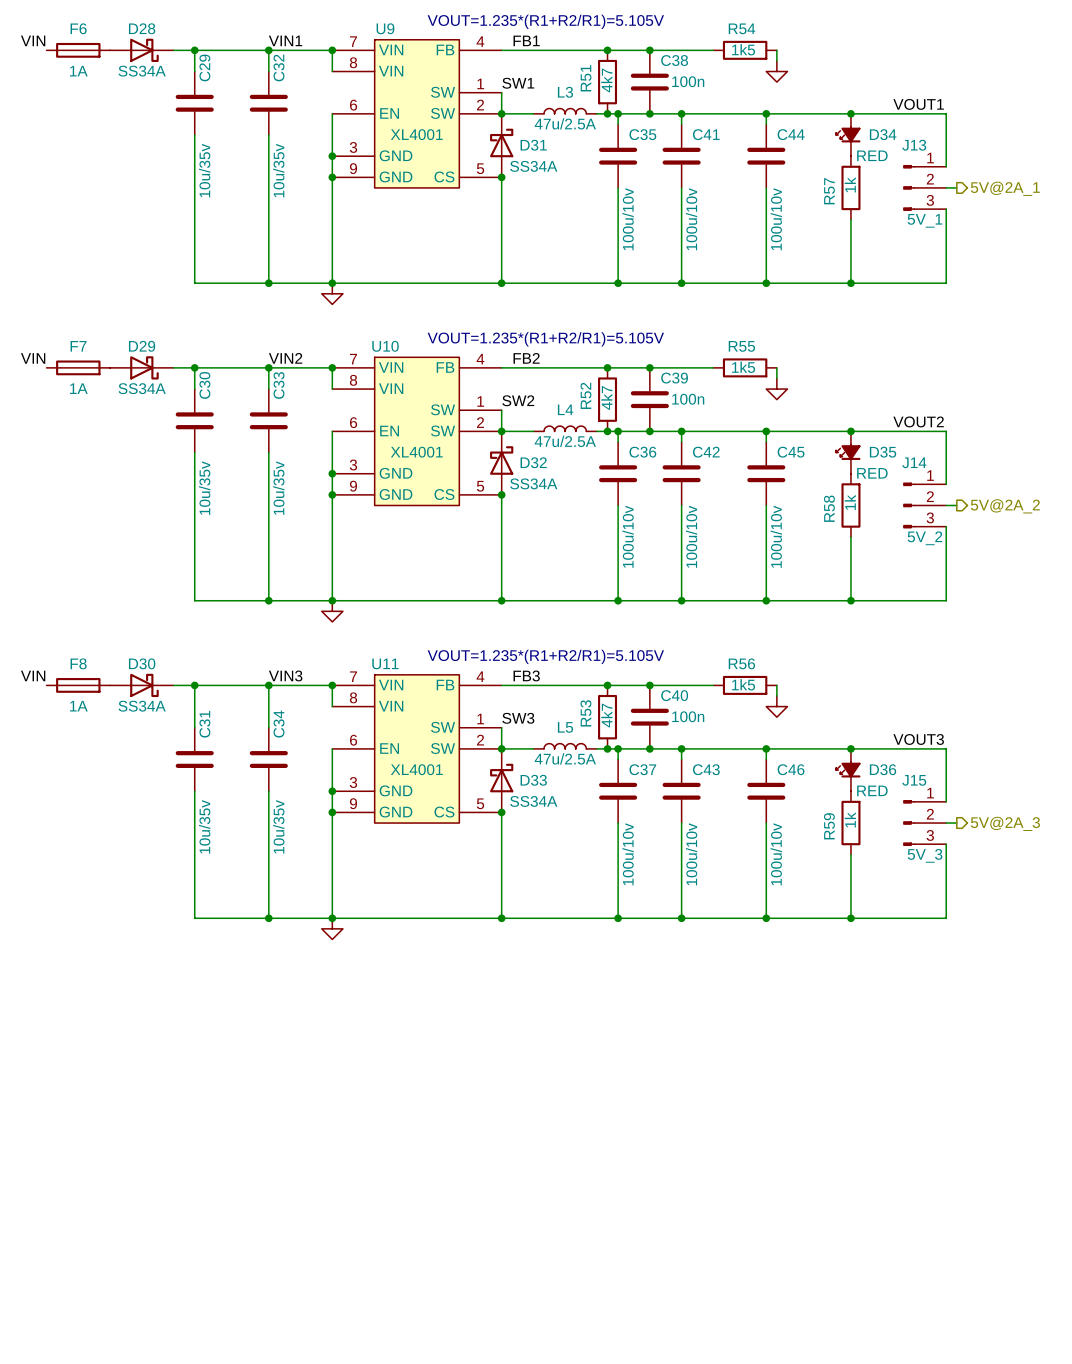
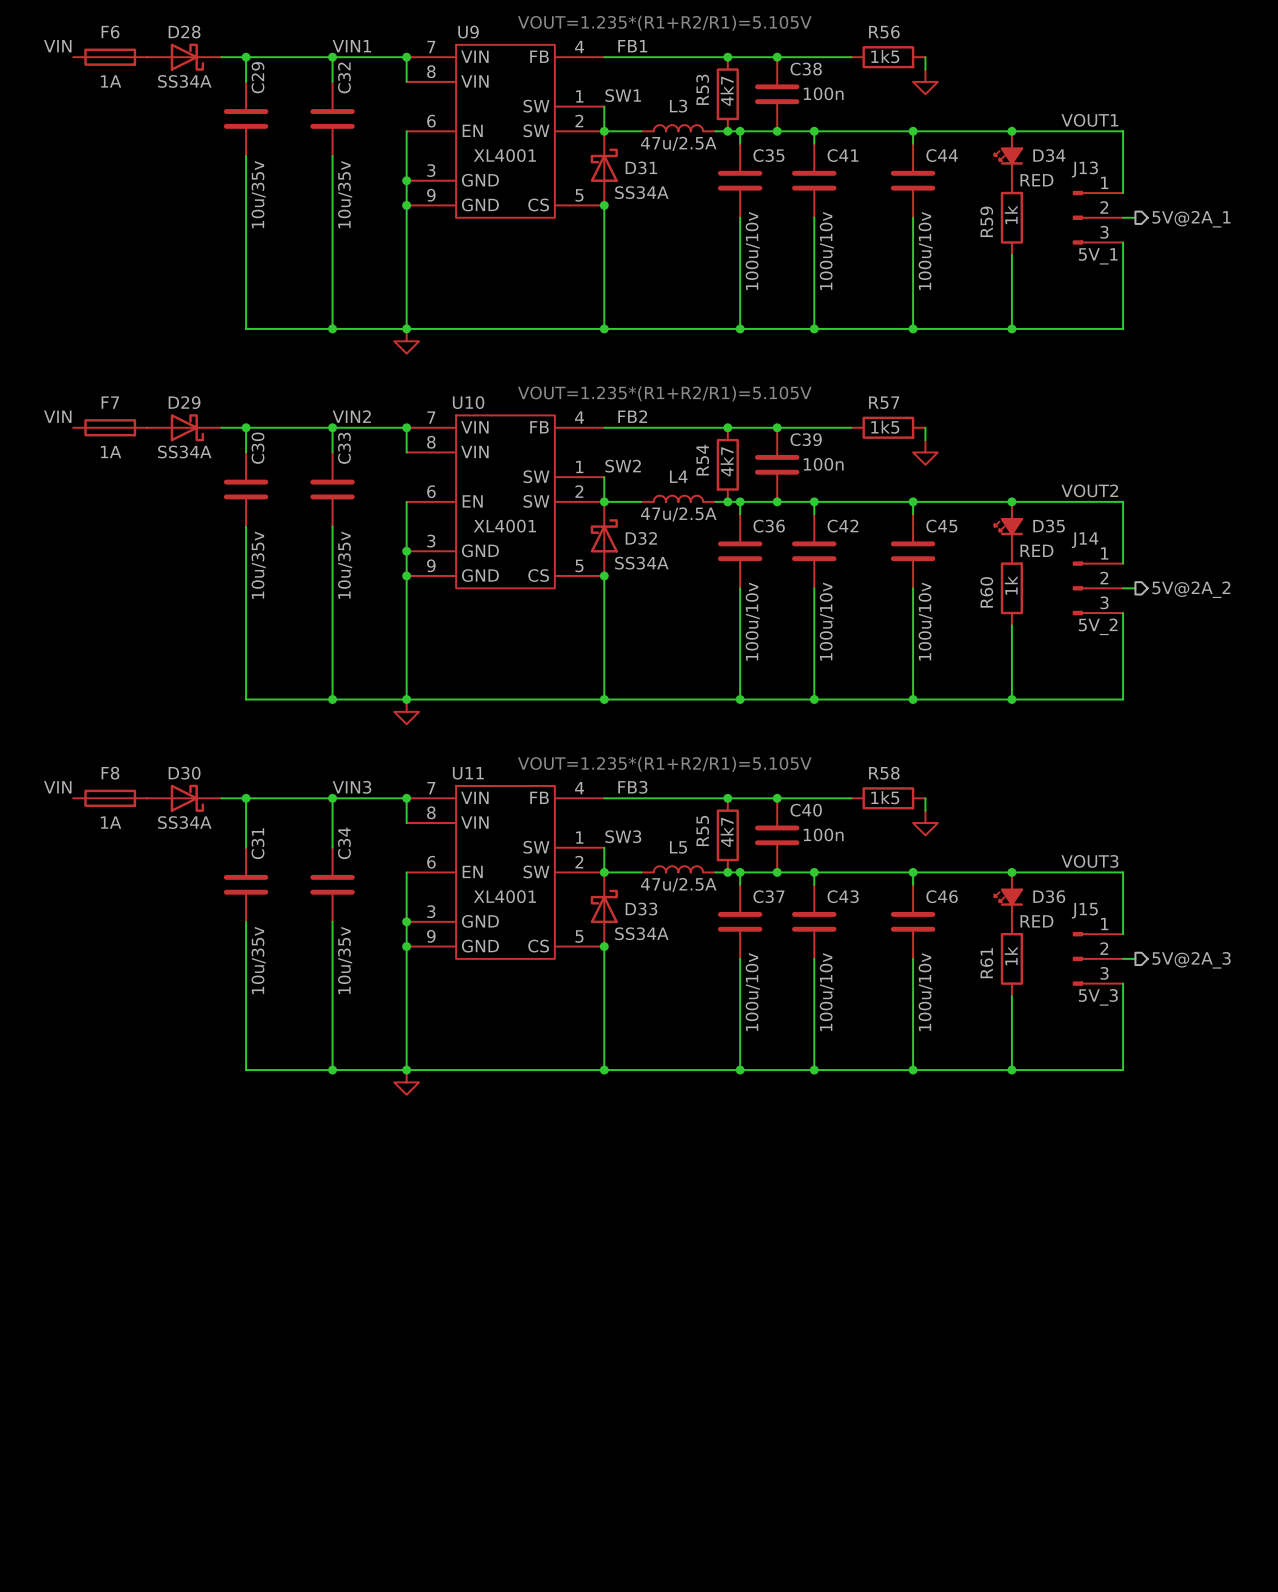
R54 name: R54 (742, 28) -> R56 (884, 32)
R51 name: R51 (586, 78) -> R53 (702, 89)
R57 name: R57 (829, 191) -> R59 (986, 221)
R55 name: R55 (741, 346) -> R57 (884, 402)
R52 name: R52 (585, 395) -> R54 (702, 460)
R58 name: R58 (829, 508) -> R60 (986, 592)
R56 name: R56 (741, 663) -> R58 (884, 773)
R53 name: R53 (585, 713) -> R55 (702, 830)
R59 name: R59 (829, 826) -> R61 (986, 963)

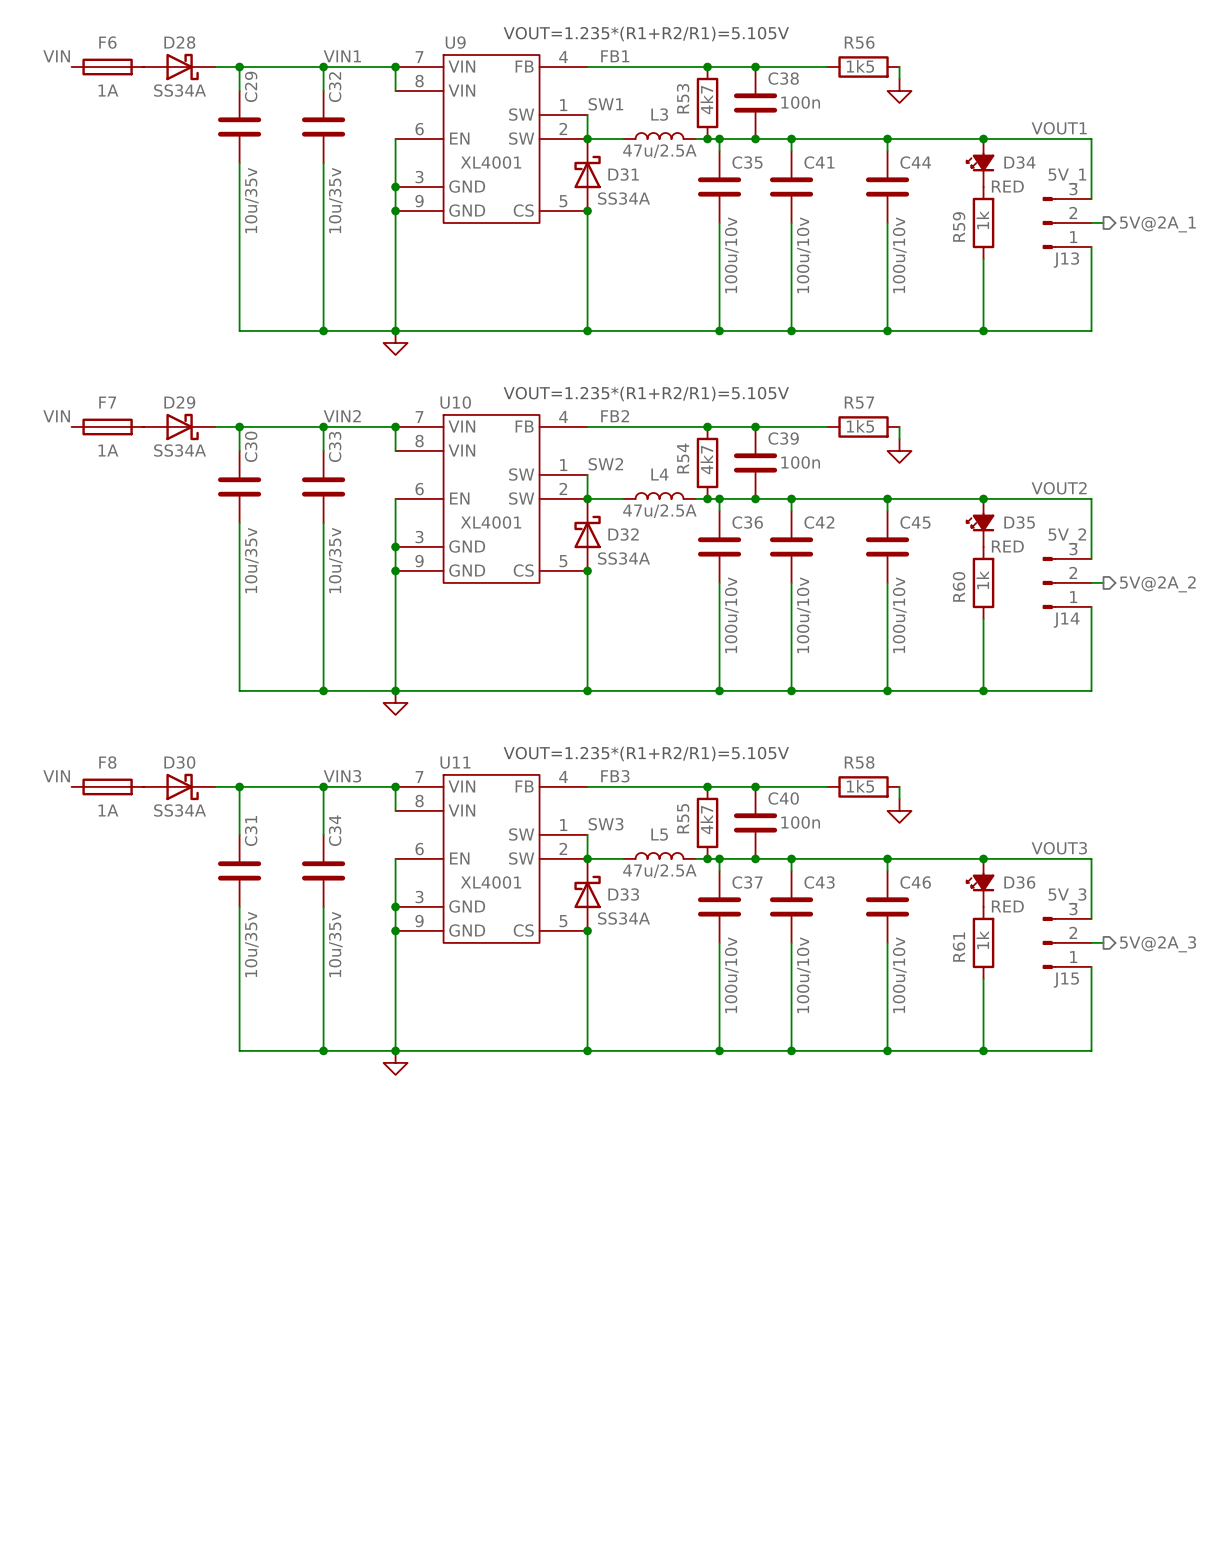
J13 flip: as is (1079, 217) -> up-down (1049, 222)
J14 flip: as is (1079, 588) -> up-down (1049, 582)
J15 flip: as is (1079, 958) -> up-down (1049, 942)

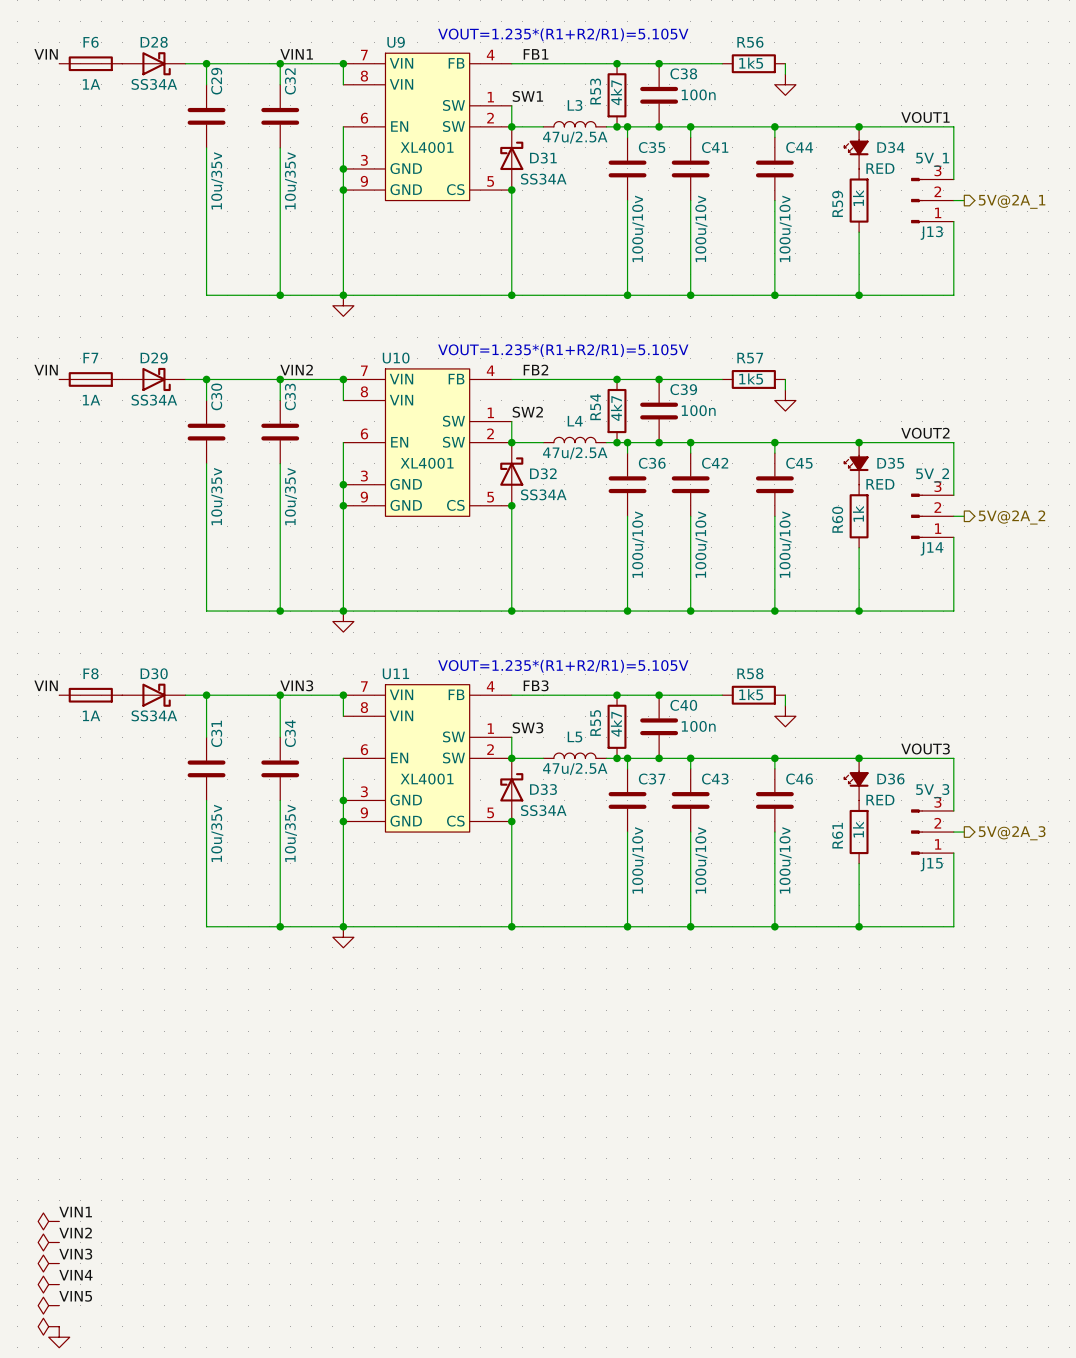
label: none -> VIN1 (75, 1212)
power symbol: none -> (48, 1221)
label: none -> VIN2 (75, 1233)
power symbol: none -> (48, 1242)
label: none -> VIN3 (75, 1254)
power symbol: none -> (48, 1263)
label: none -> VIN4 (75, 1275)
power symbol: none -> (48, 1284)
label: none -> VIN5 (75, 1296)
power symbol: none -> (48, 1305)
power symbol: none -> (48, 1326)
power symbol: none -> (59, 1337)

